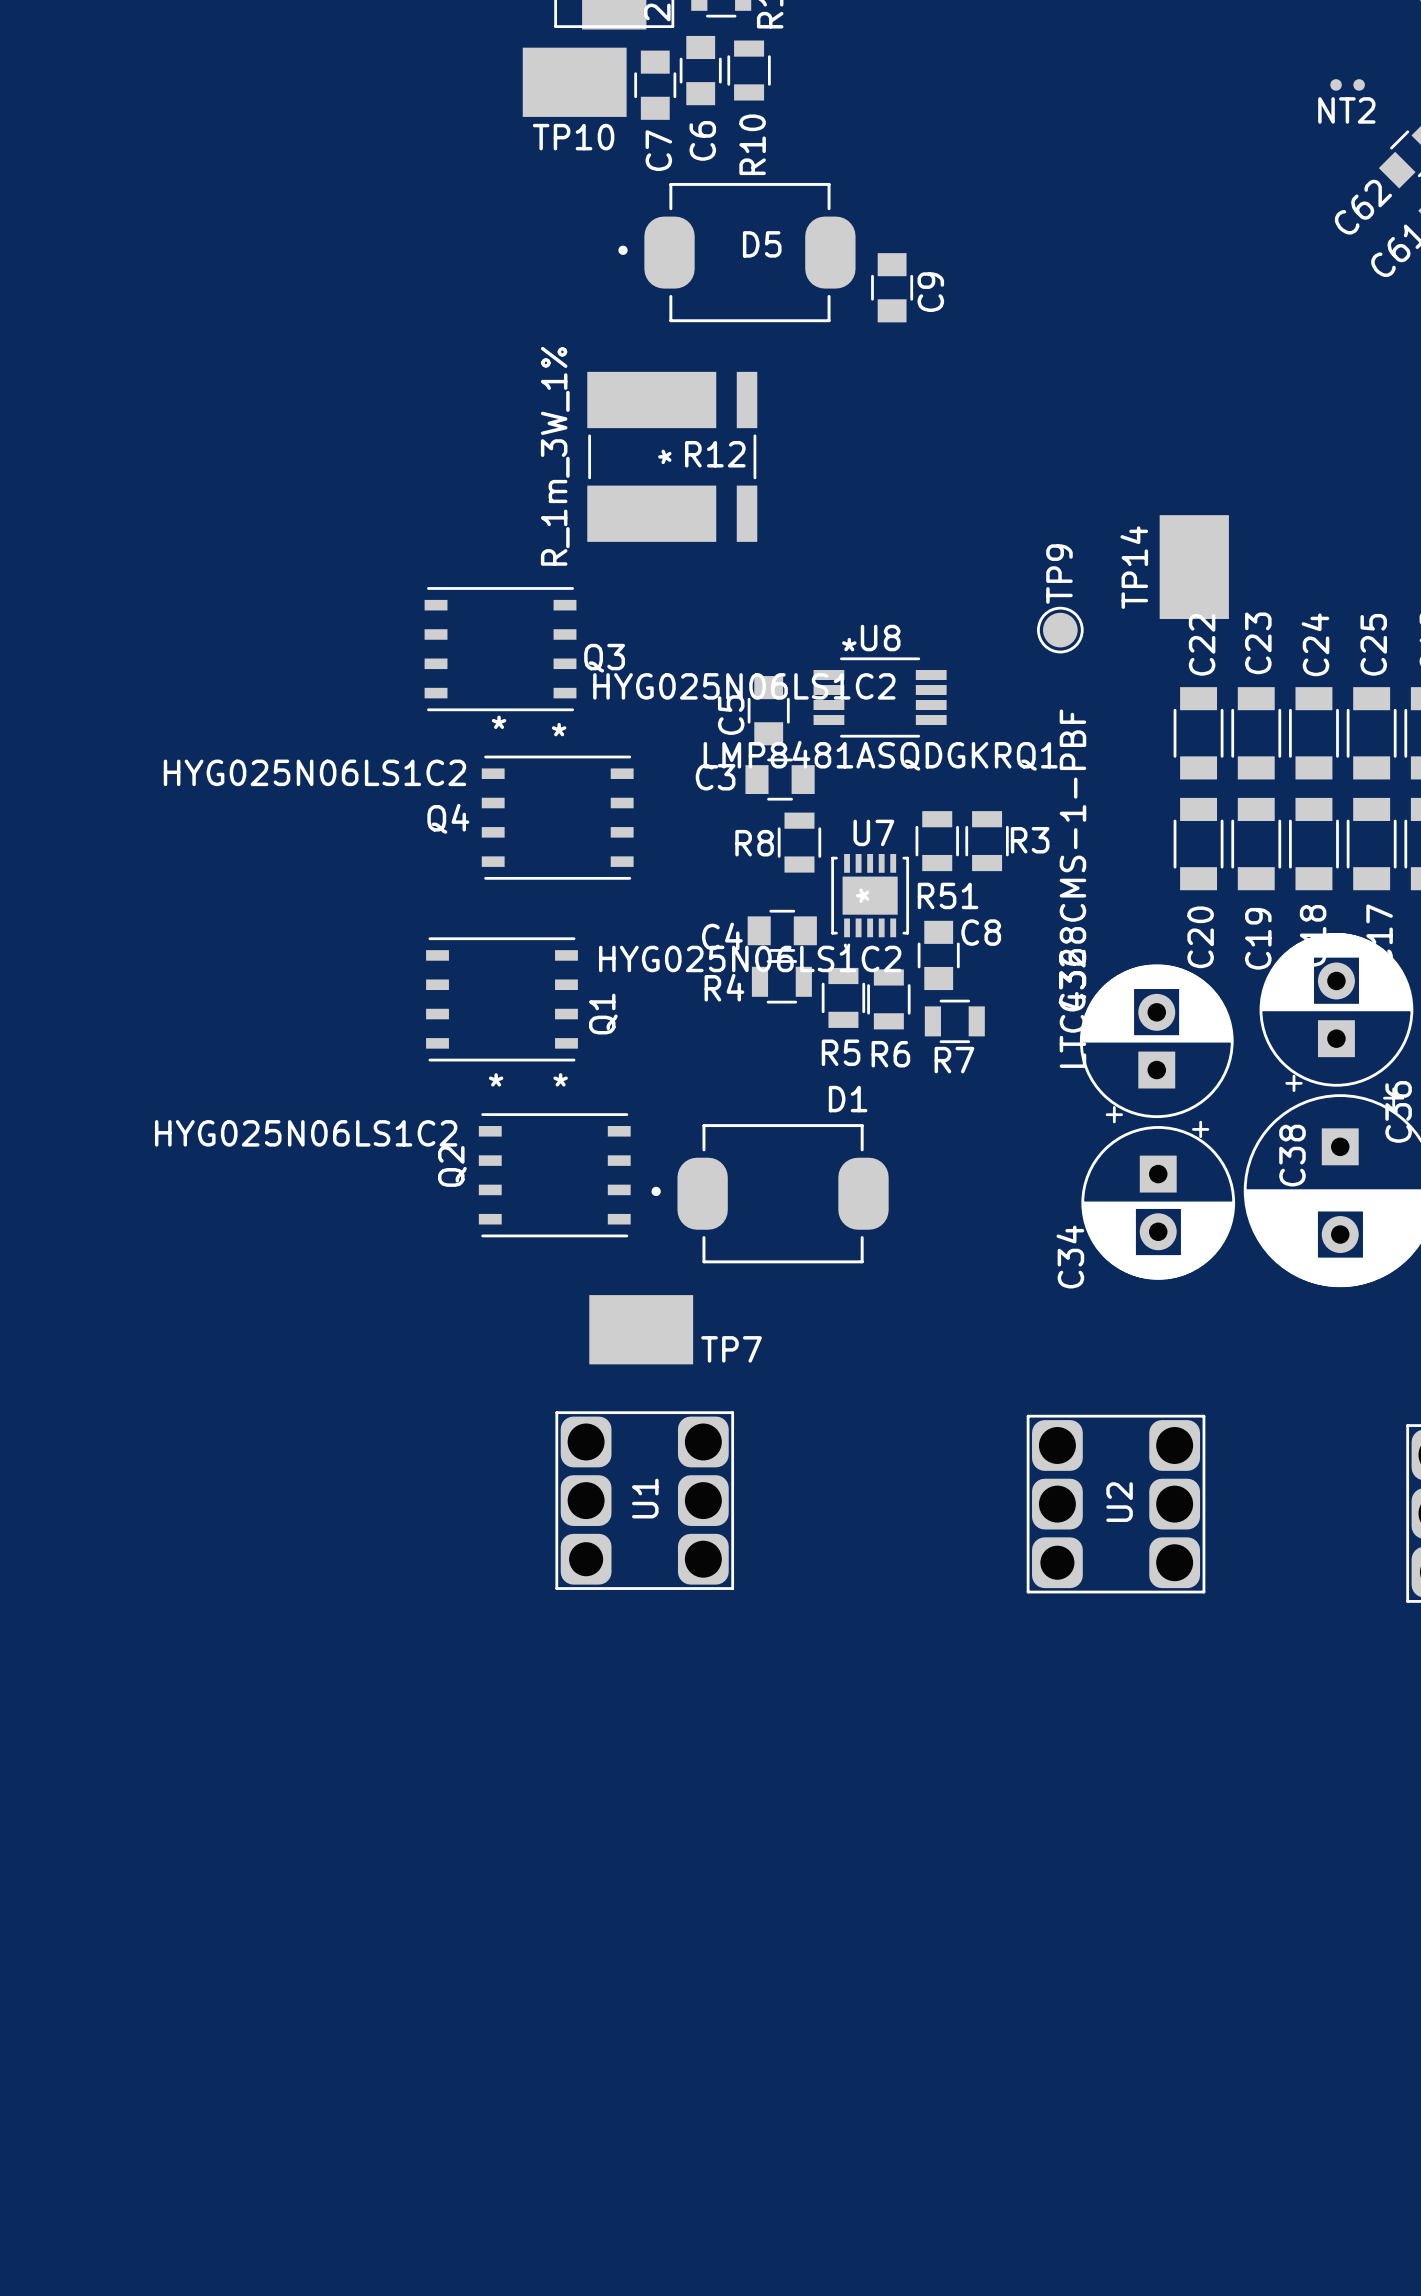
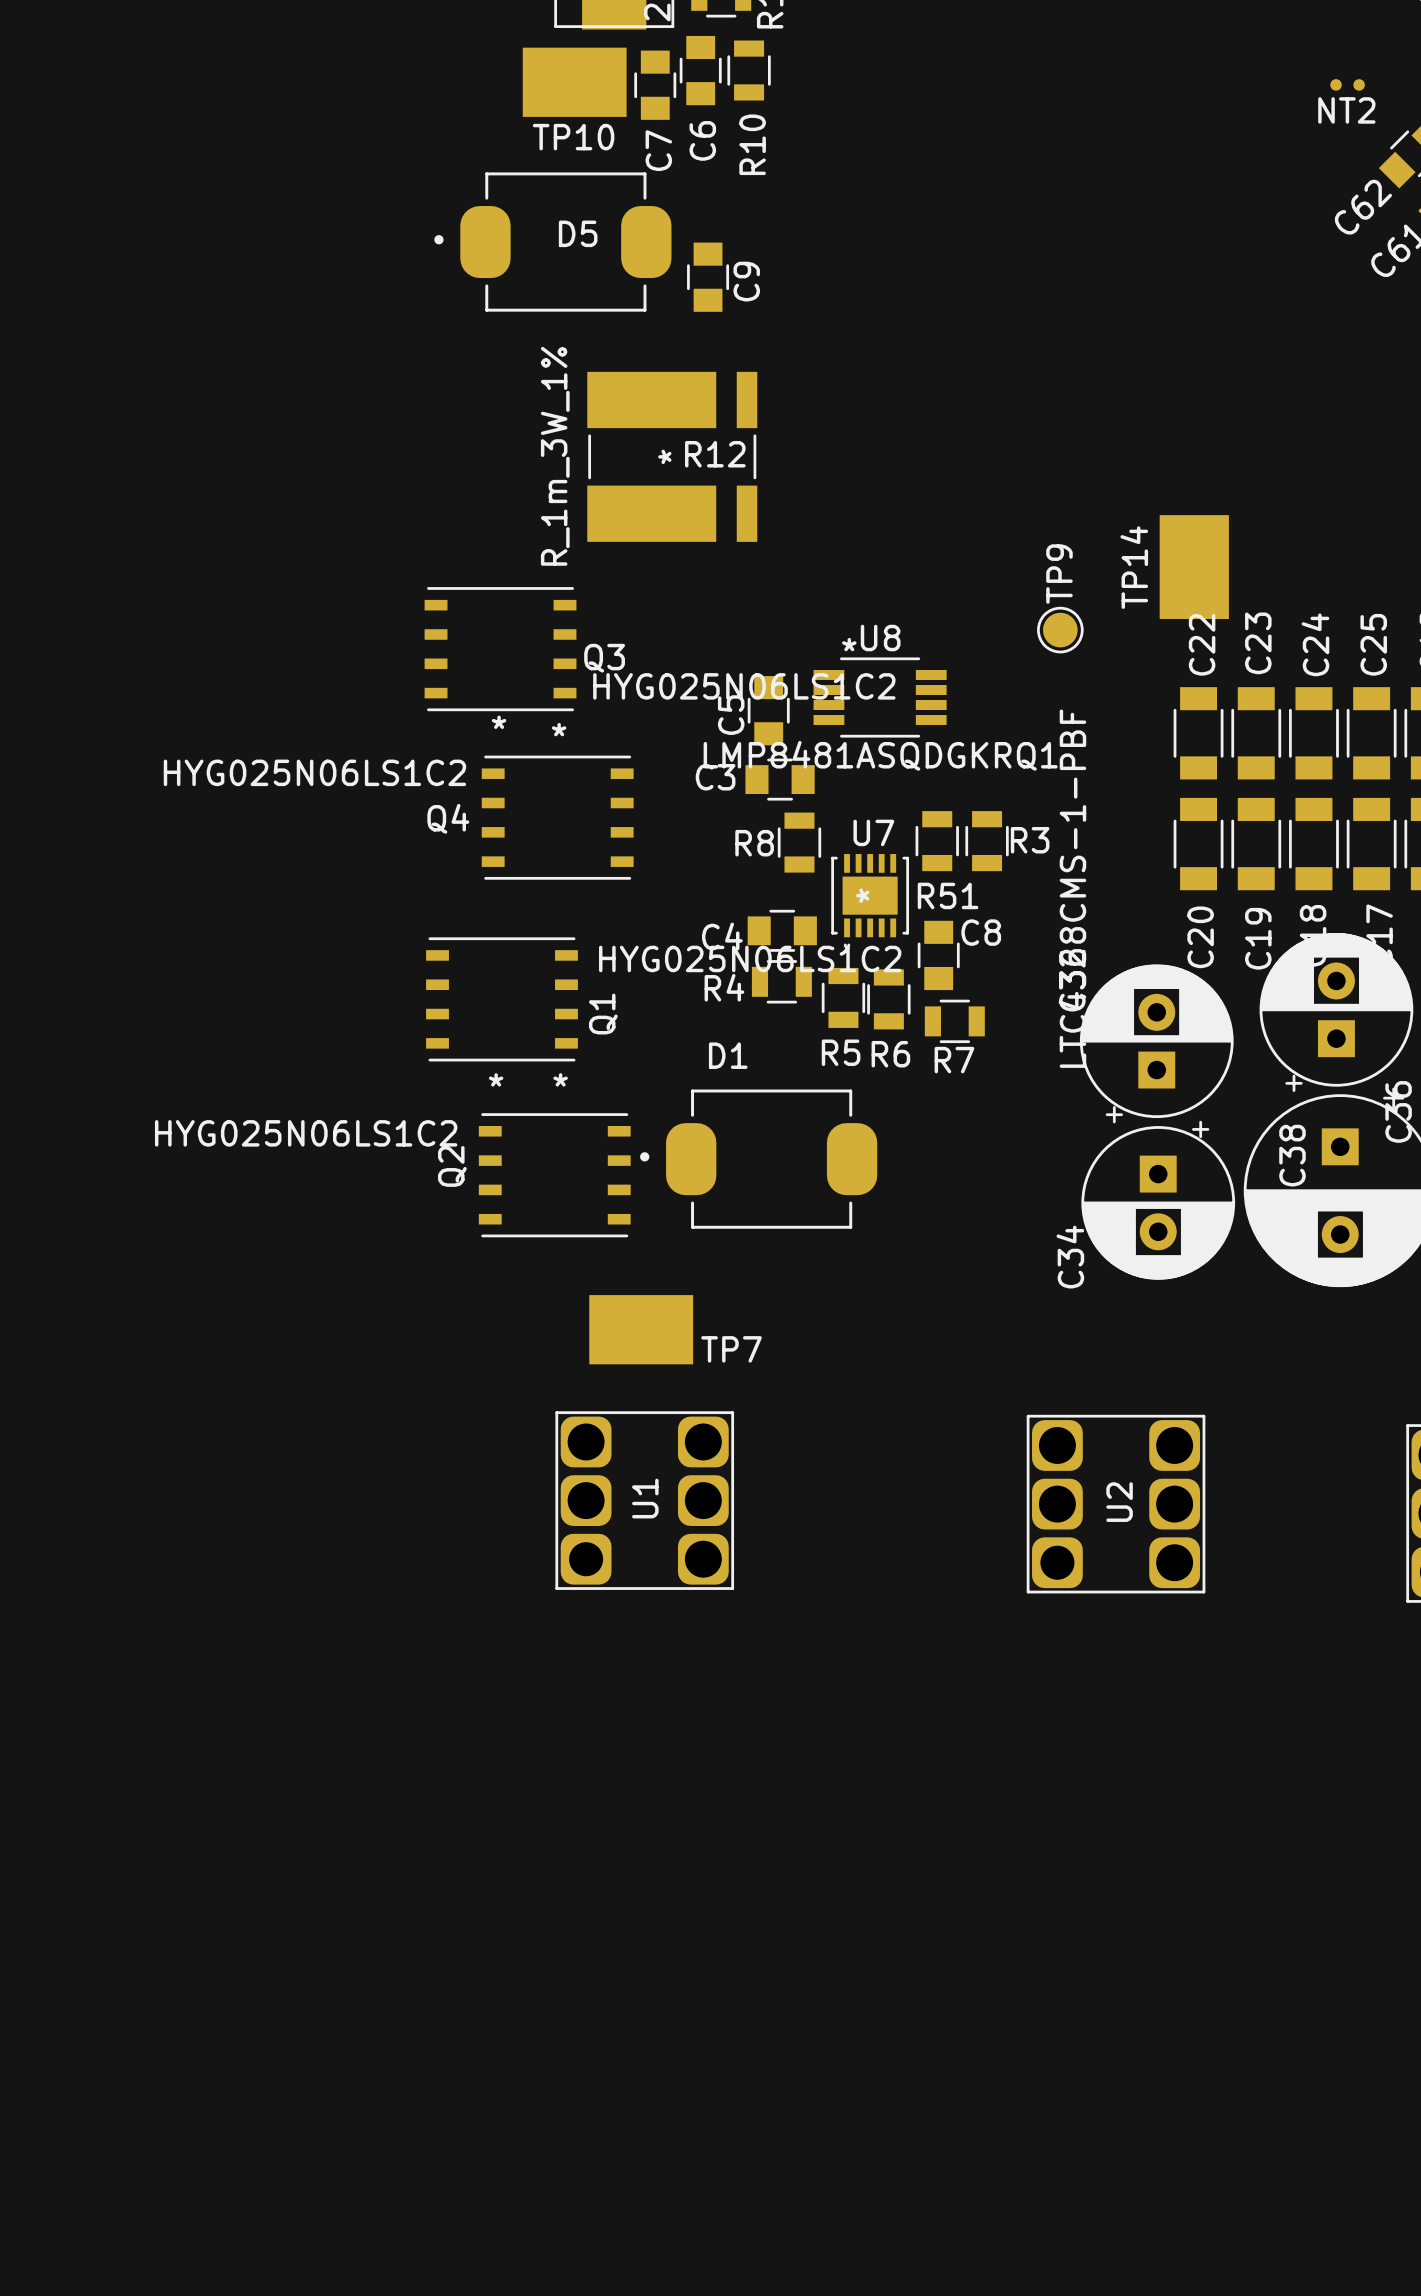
D5 position: (736, 252) -> (552, 242)
C9 position: (892, 287) -> (708, 277)
D1 name position: D1 (848, 1099) -> D1 (728, 1055)
D1 position: (770, 1193) -> (758, 1159)

